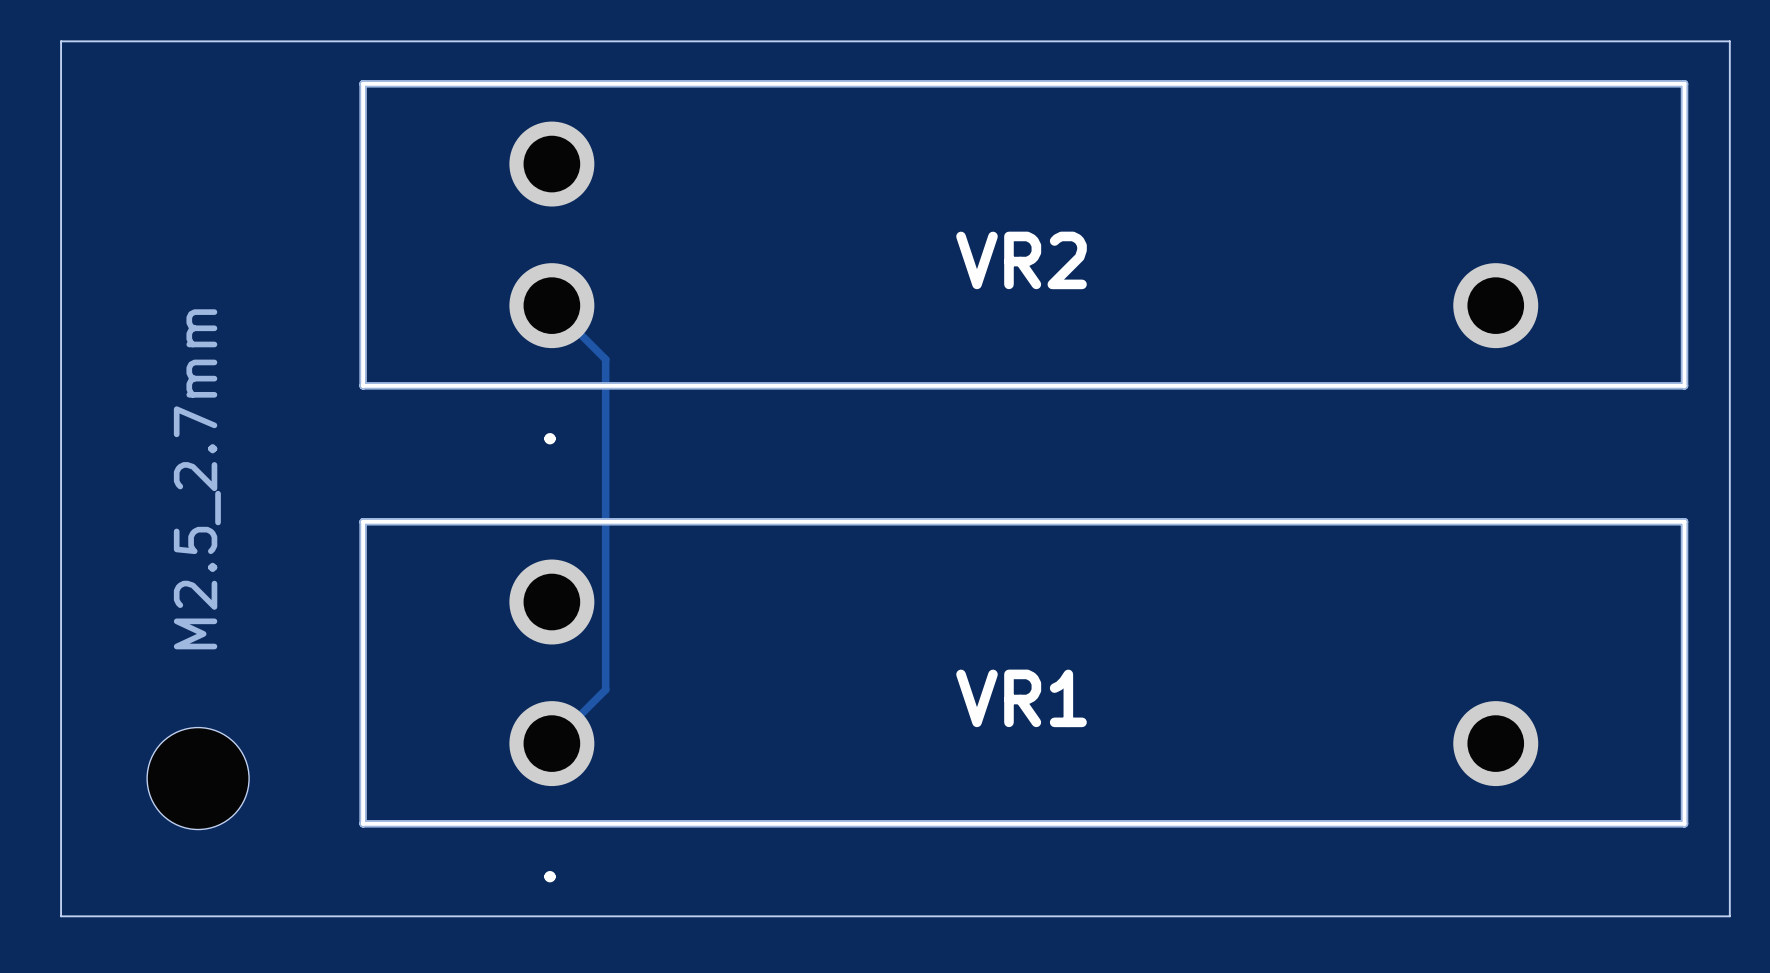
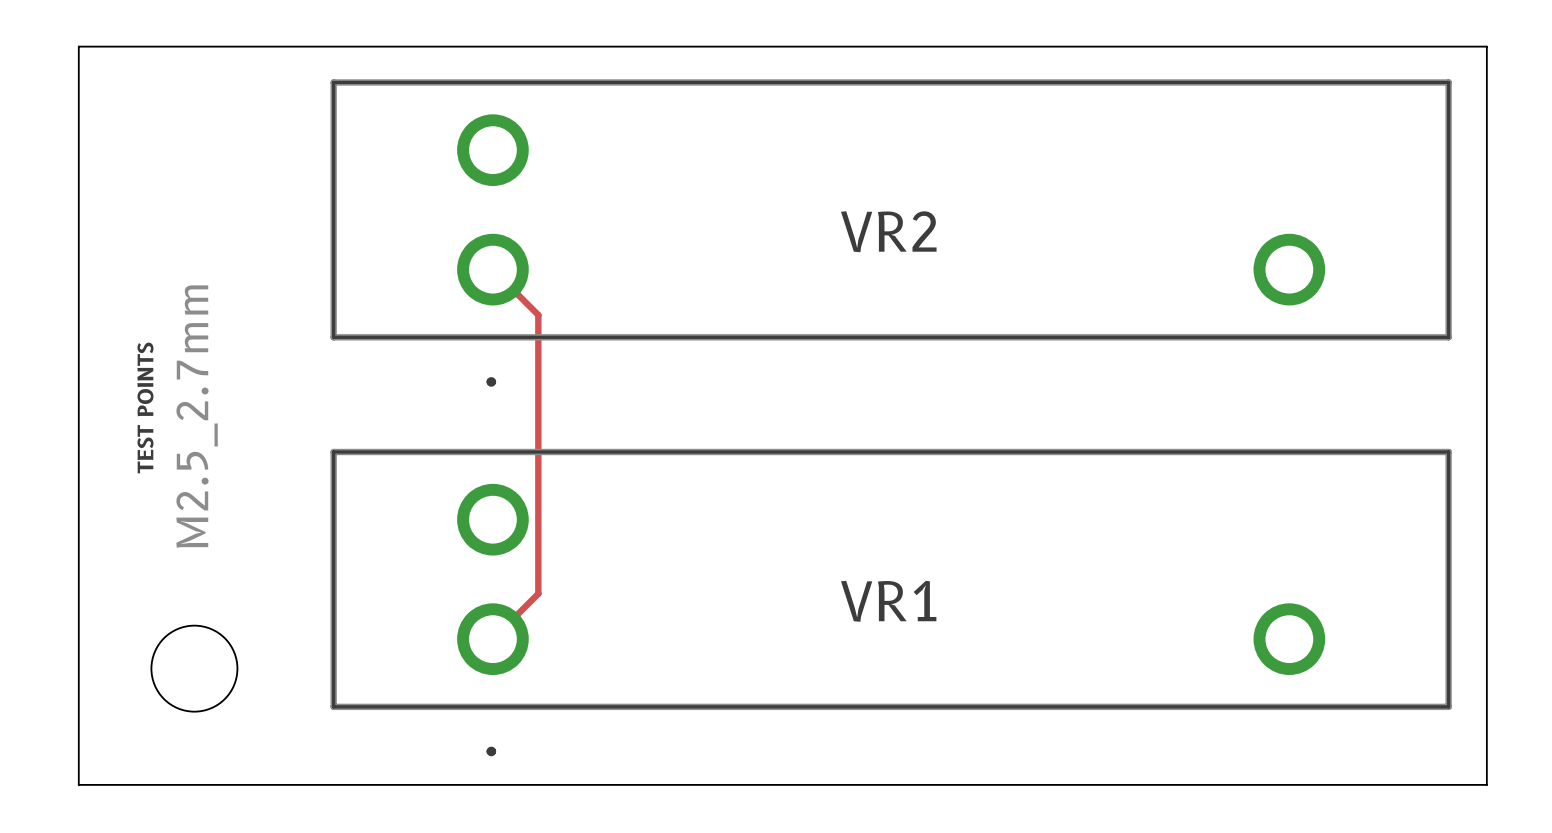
text: none -> TEST POINTS (145, 407)

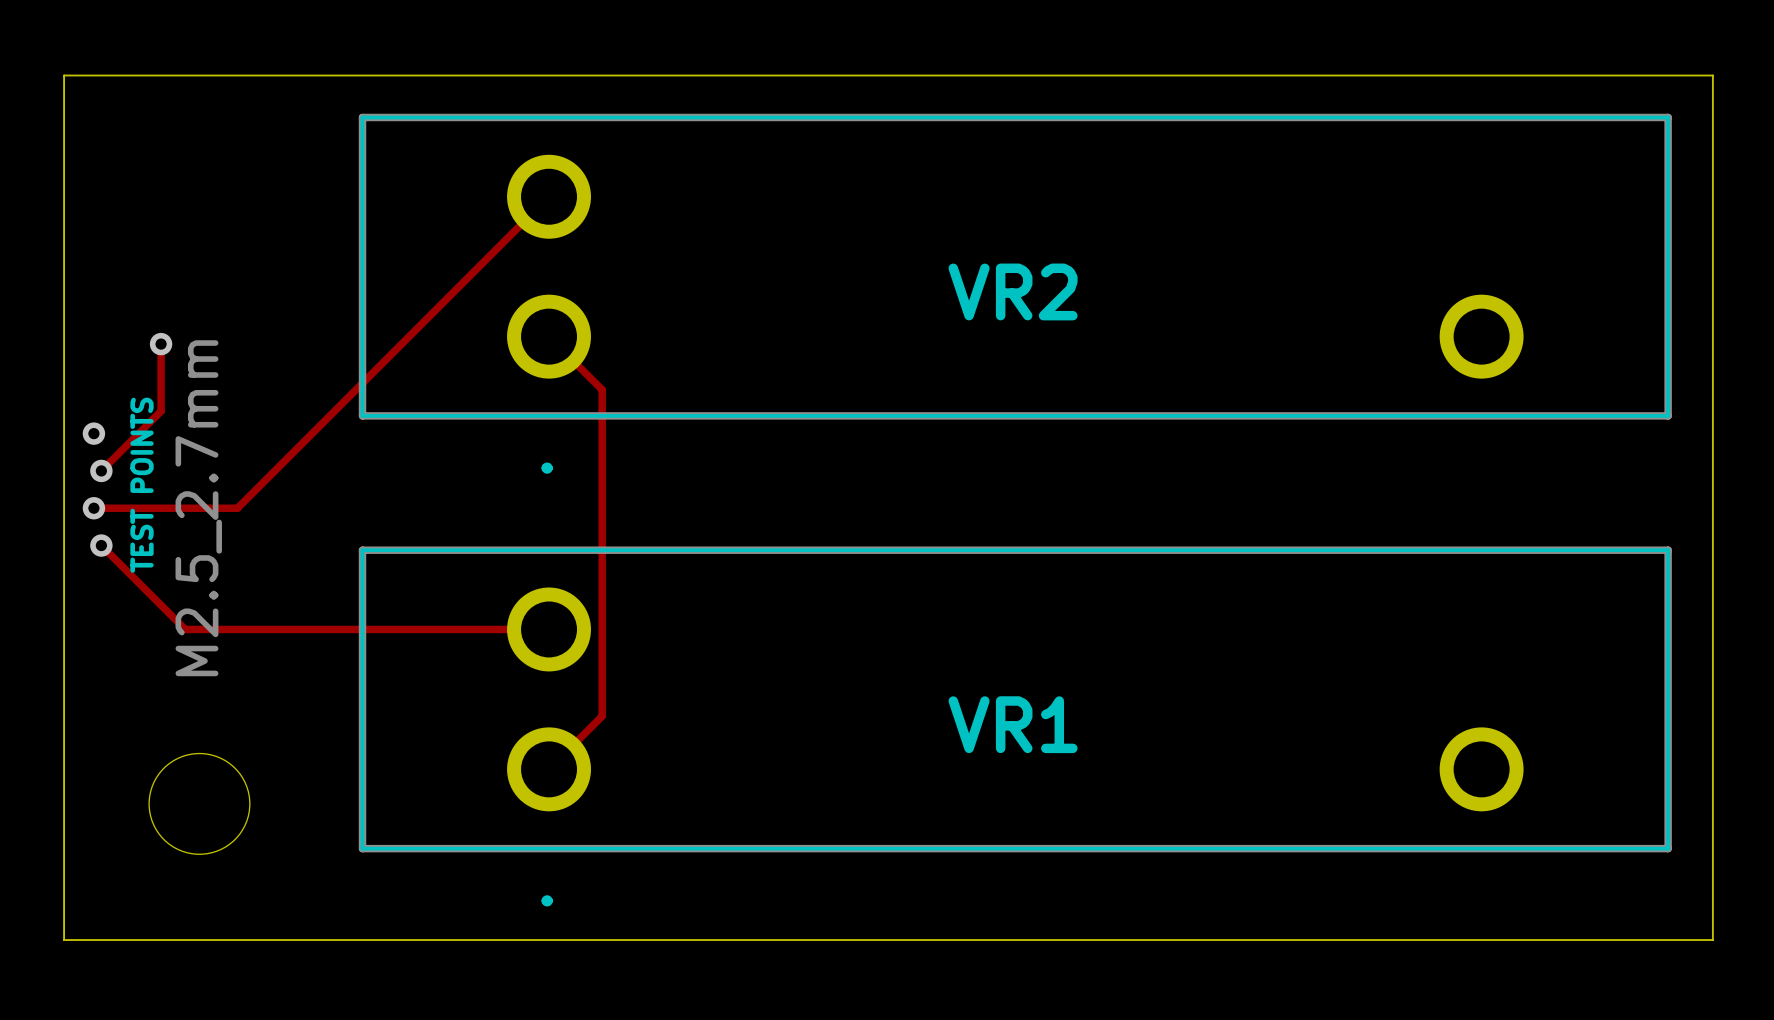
track: none -> (549, 196) (237, 508) (93, 508)
track: none -> (161, 344) (161, 411) (101, 470)
via: none -> (161, 344)
via: none -> (93, 433)
via: none -> (101, 470)
via: none -> (93, 508)
track: none -> (101, 545) (185, 629) (549, 629)
via: none -> (101, 545)

